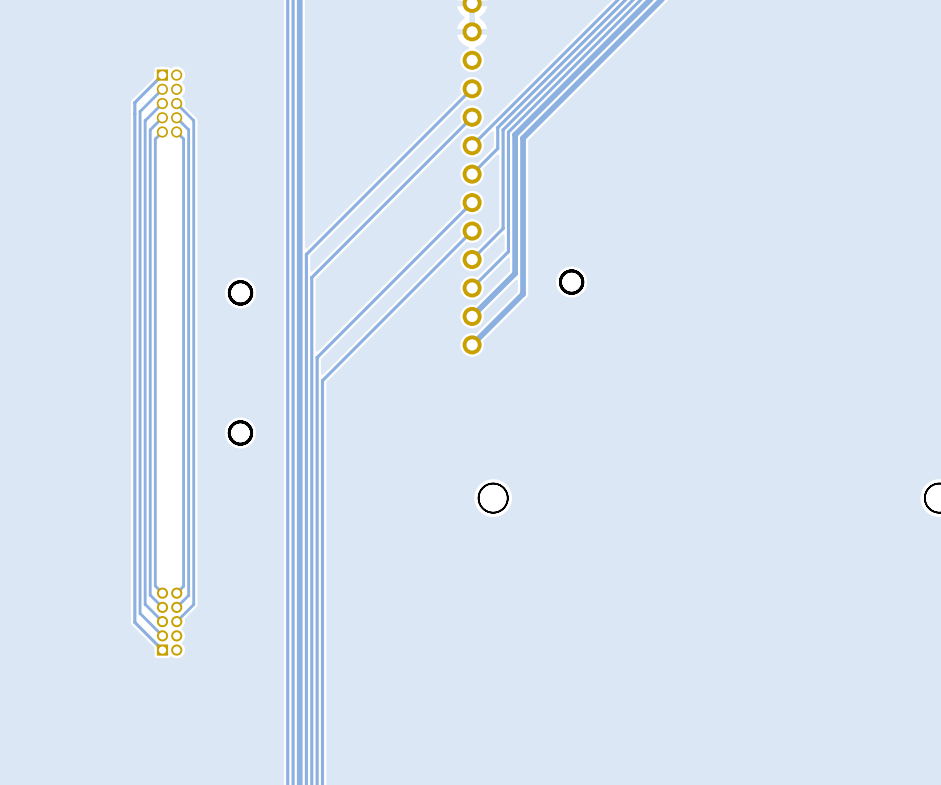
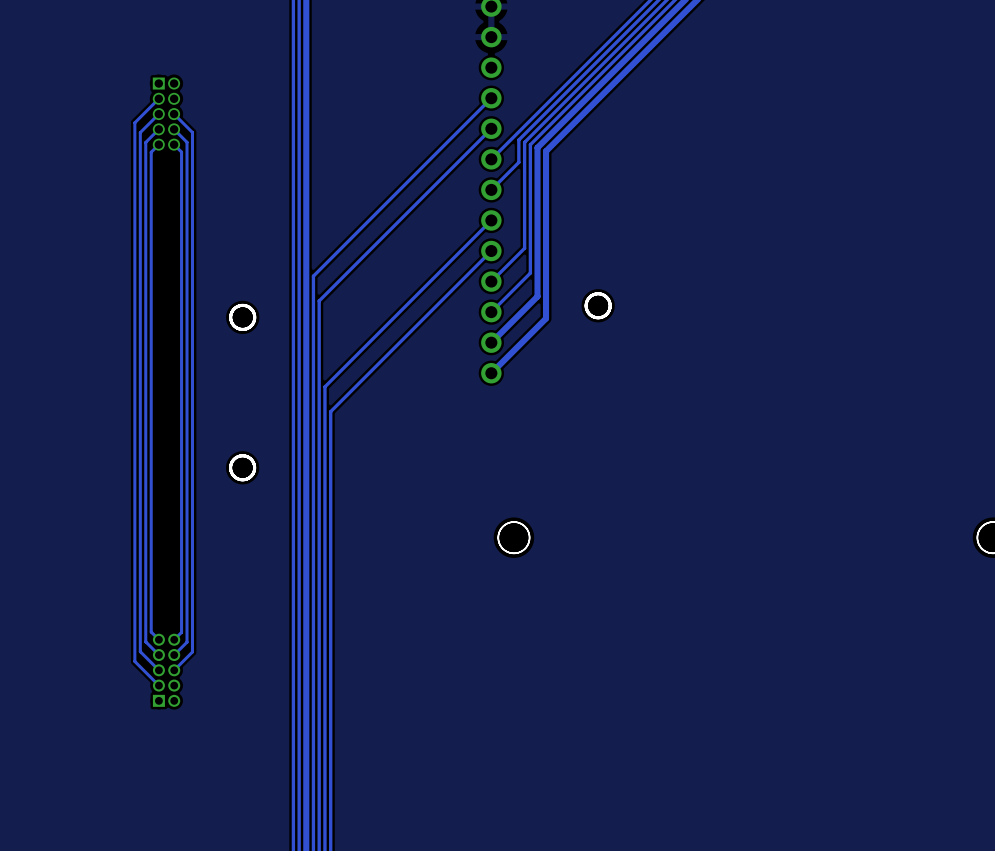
track: (162, 75) (134, 102) (134, 622) (162, 650) -> none

